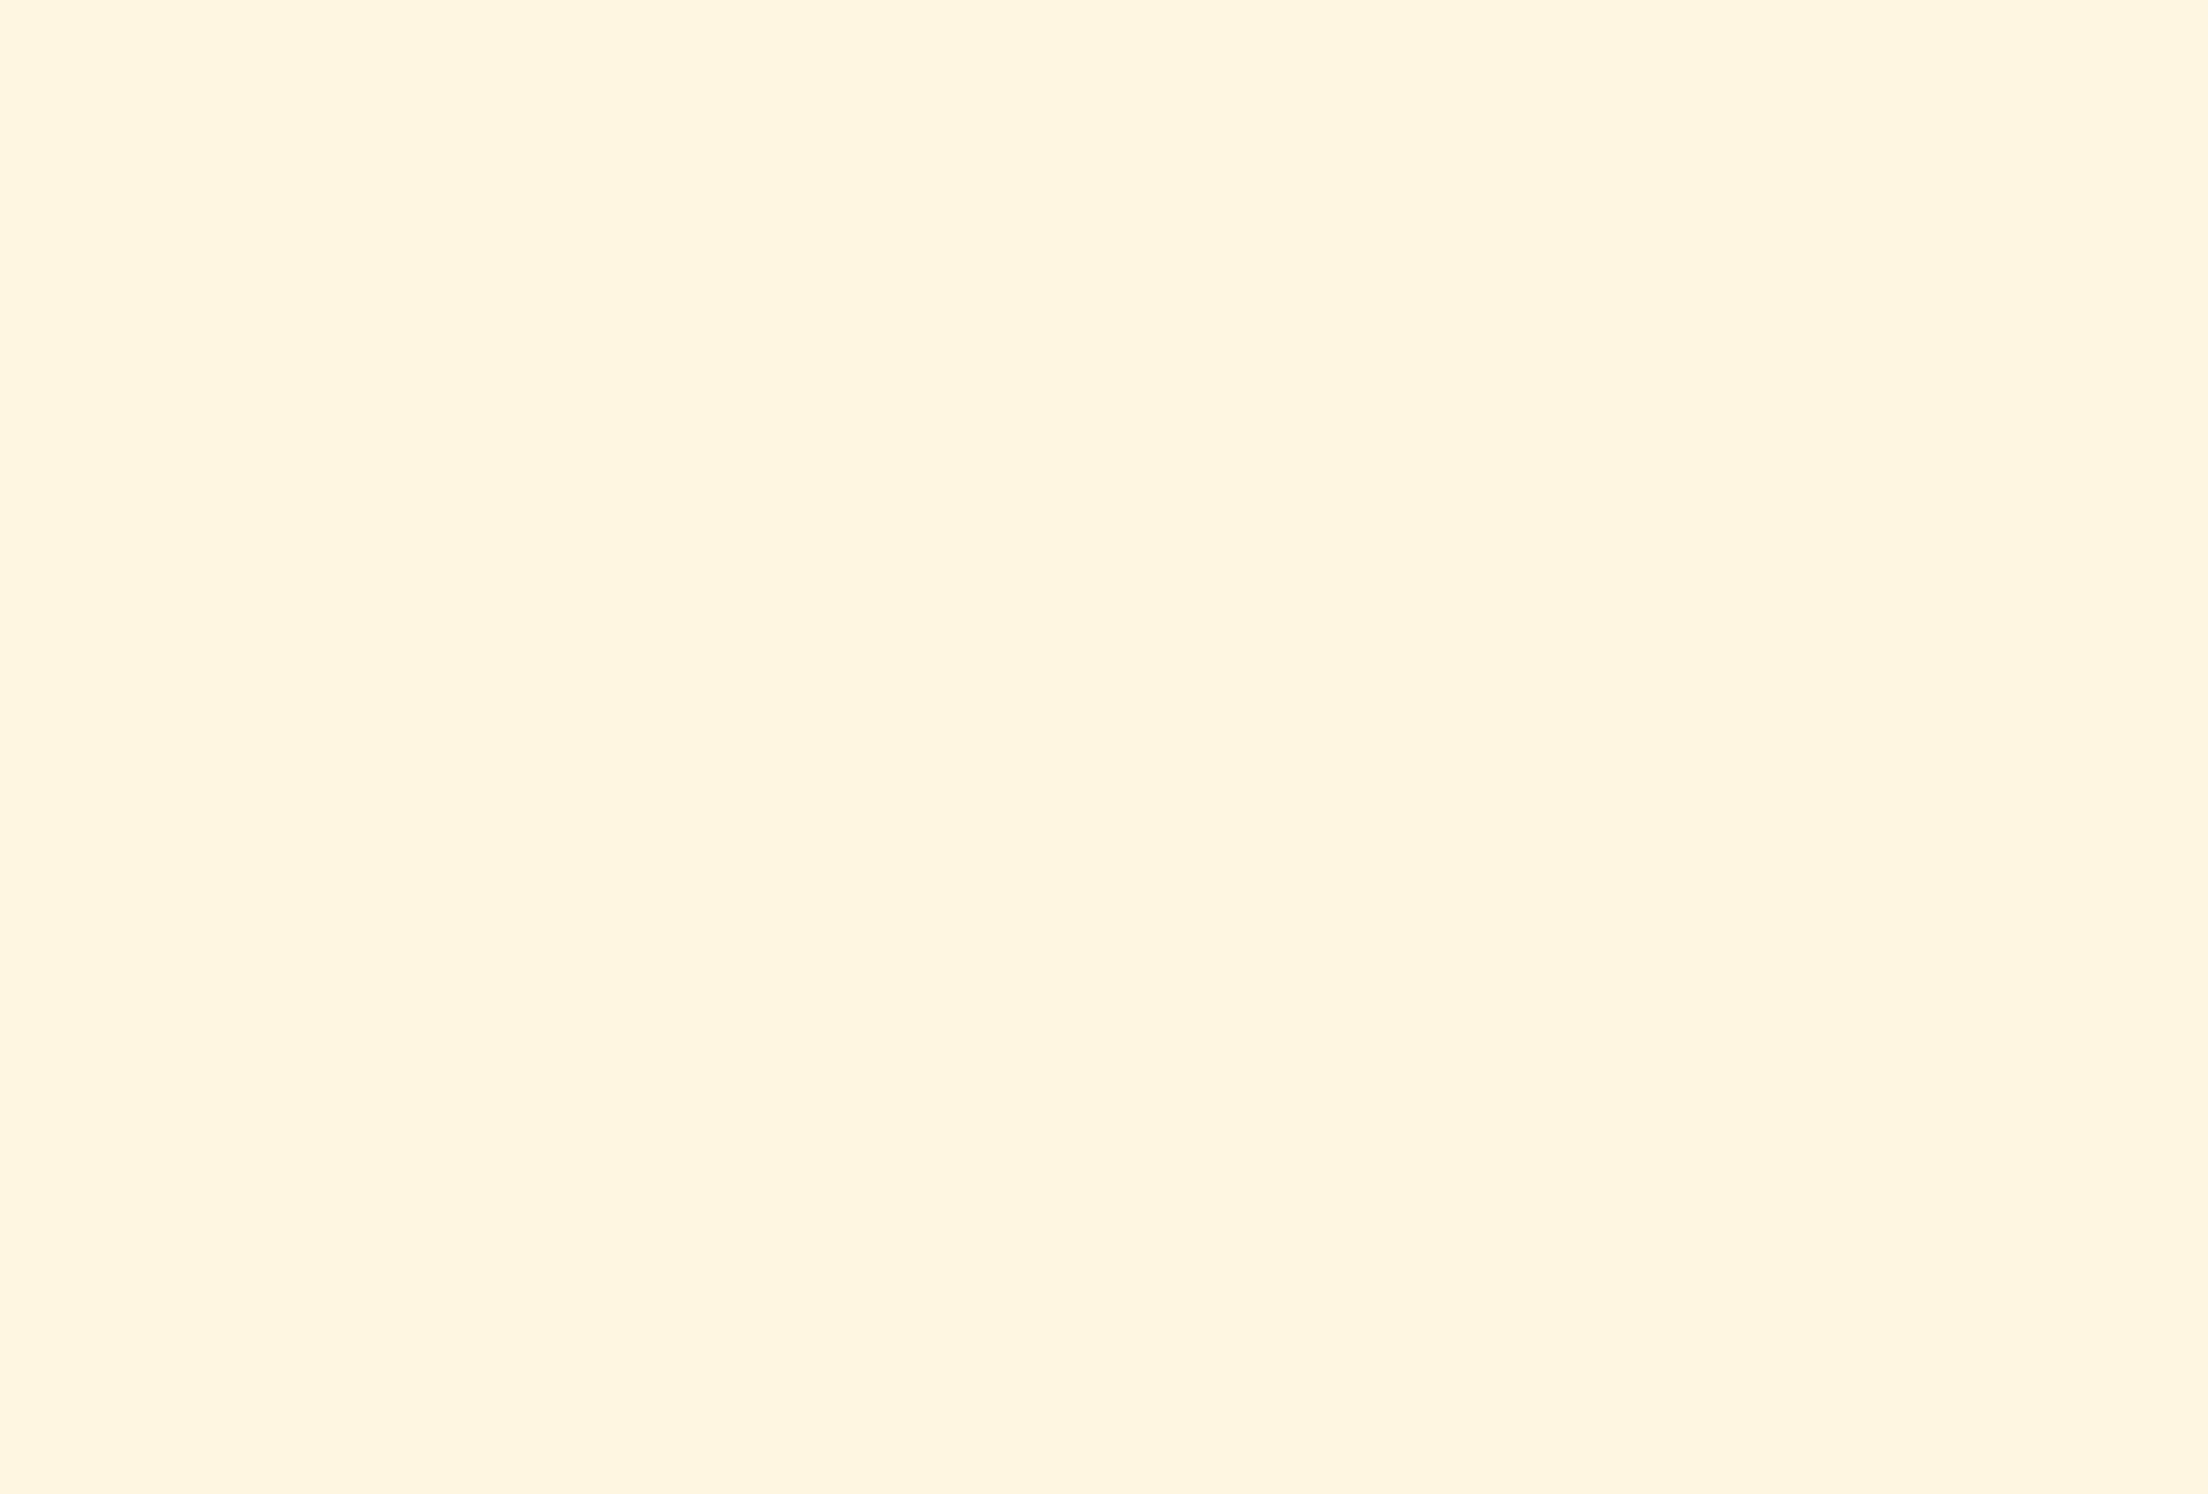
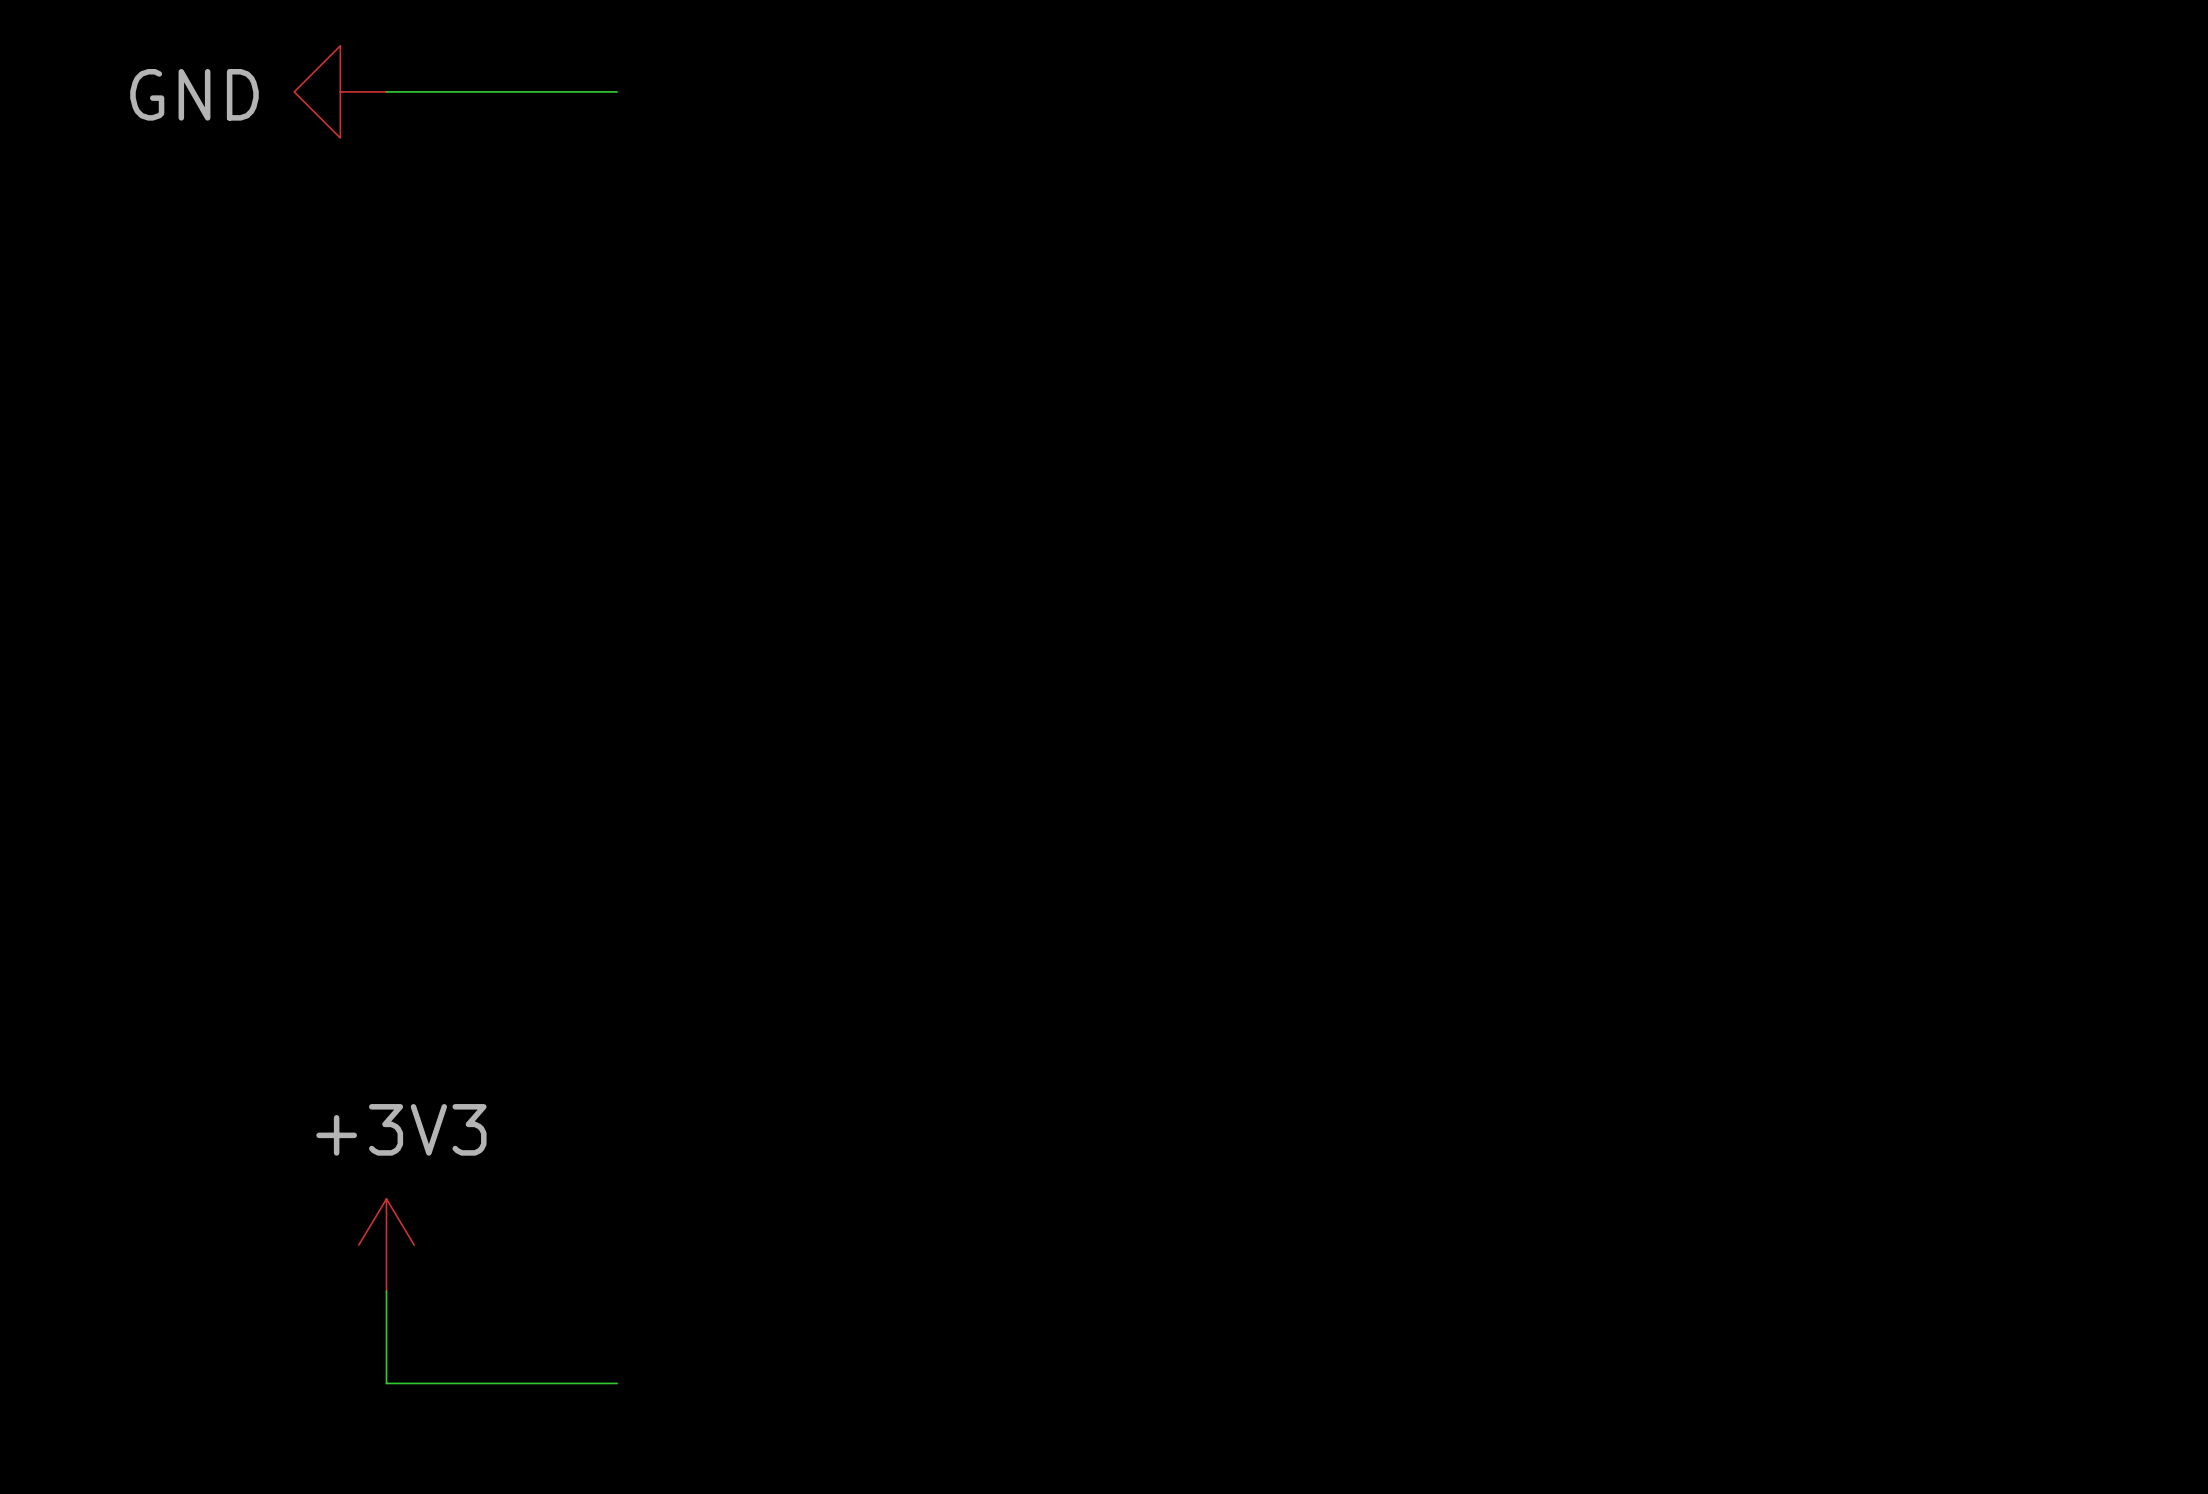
power symbol: none -> GND (340, 91)
wire: none -> (386, 91) (617, 91)
power symbol: none -> +3V3 (386, 1245)
wire: none -> (386, 1291) (386, 1383) (617, 1383)

